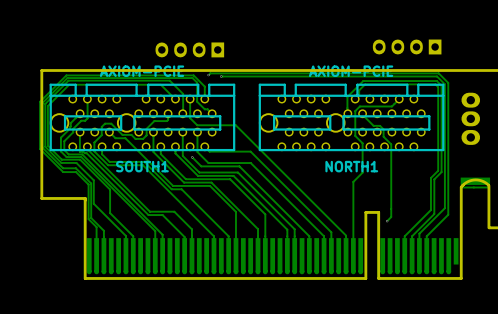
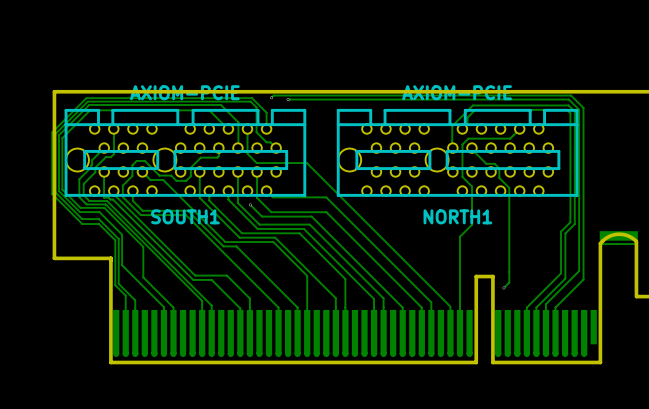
part: (407, 46) -> none
part: (189, 49) -> none
part: (470, 118) -> none

